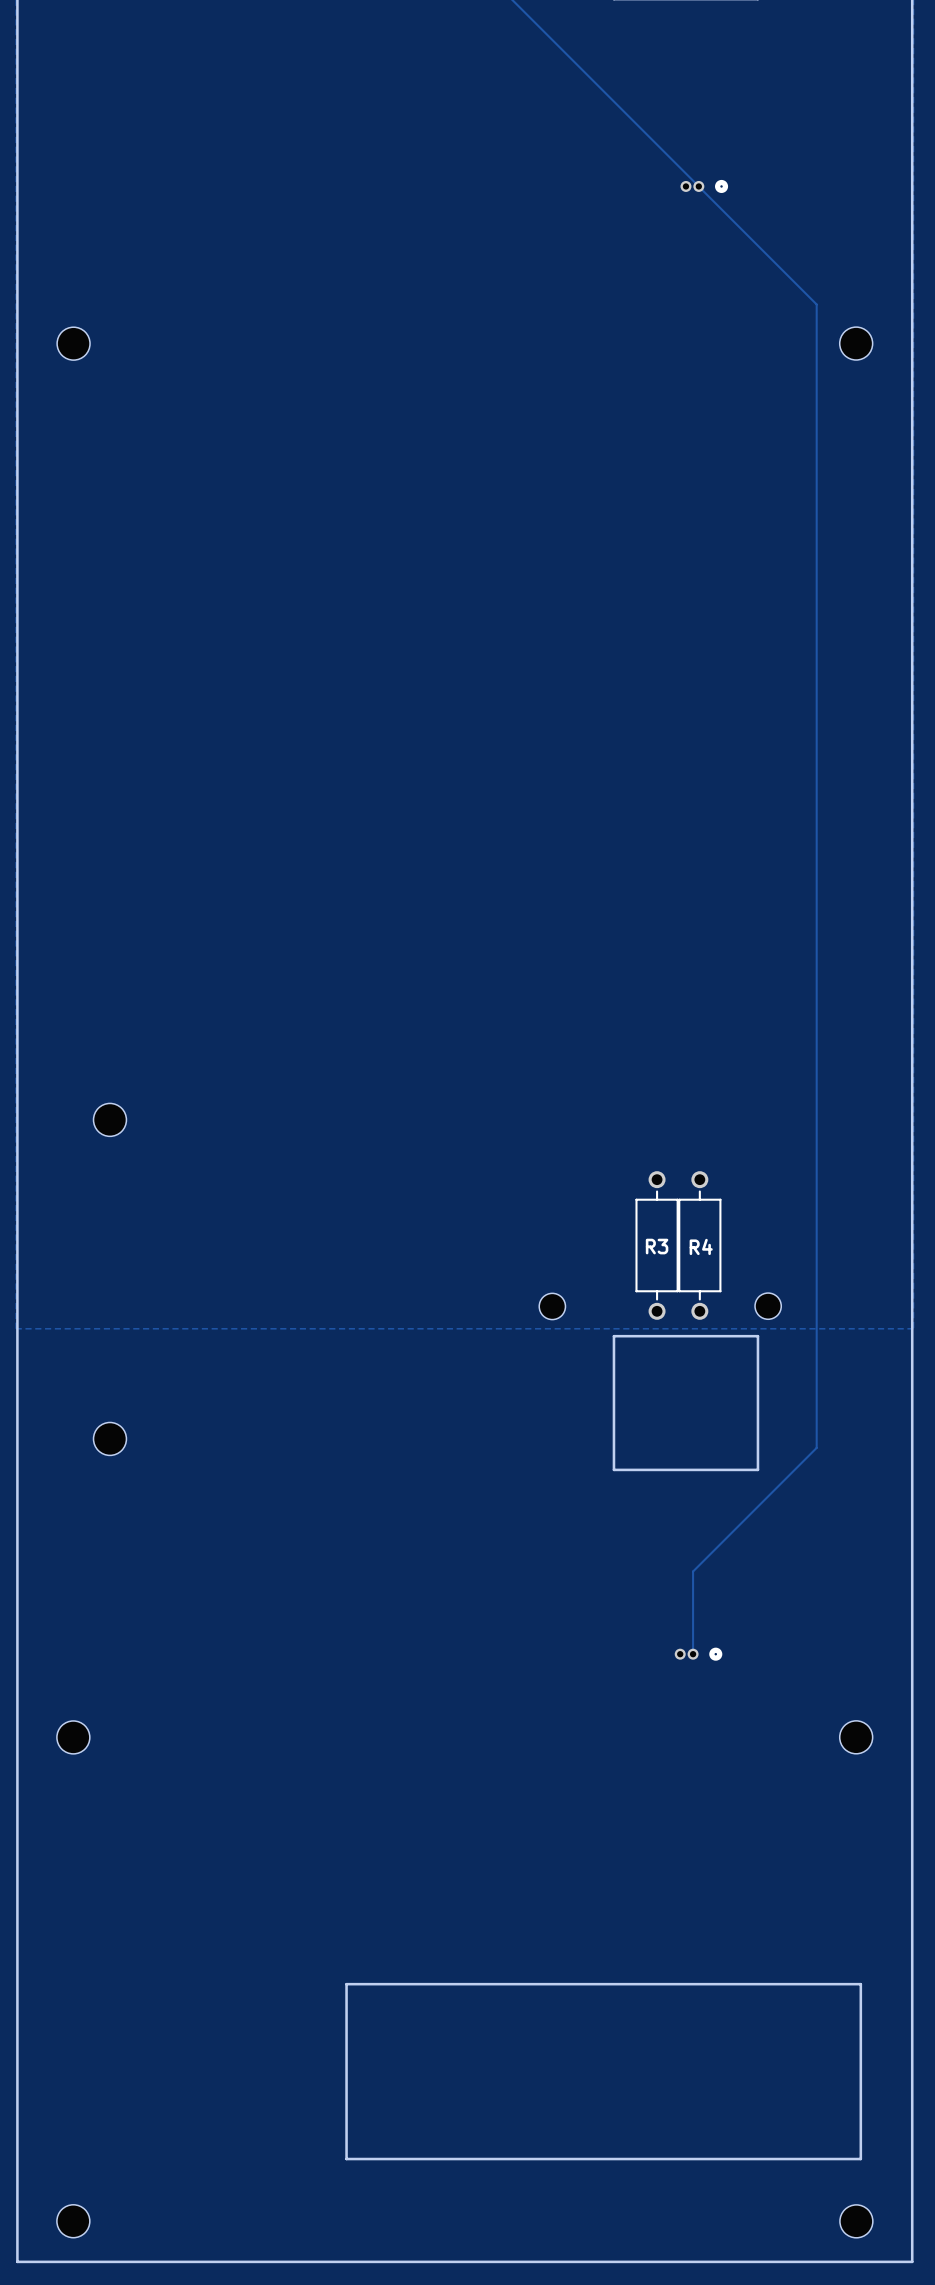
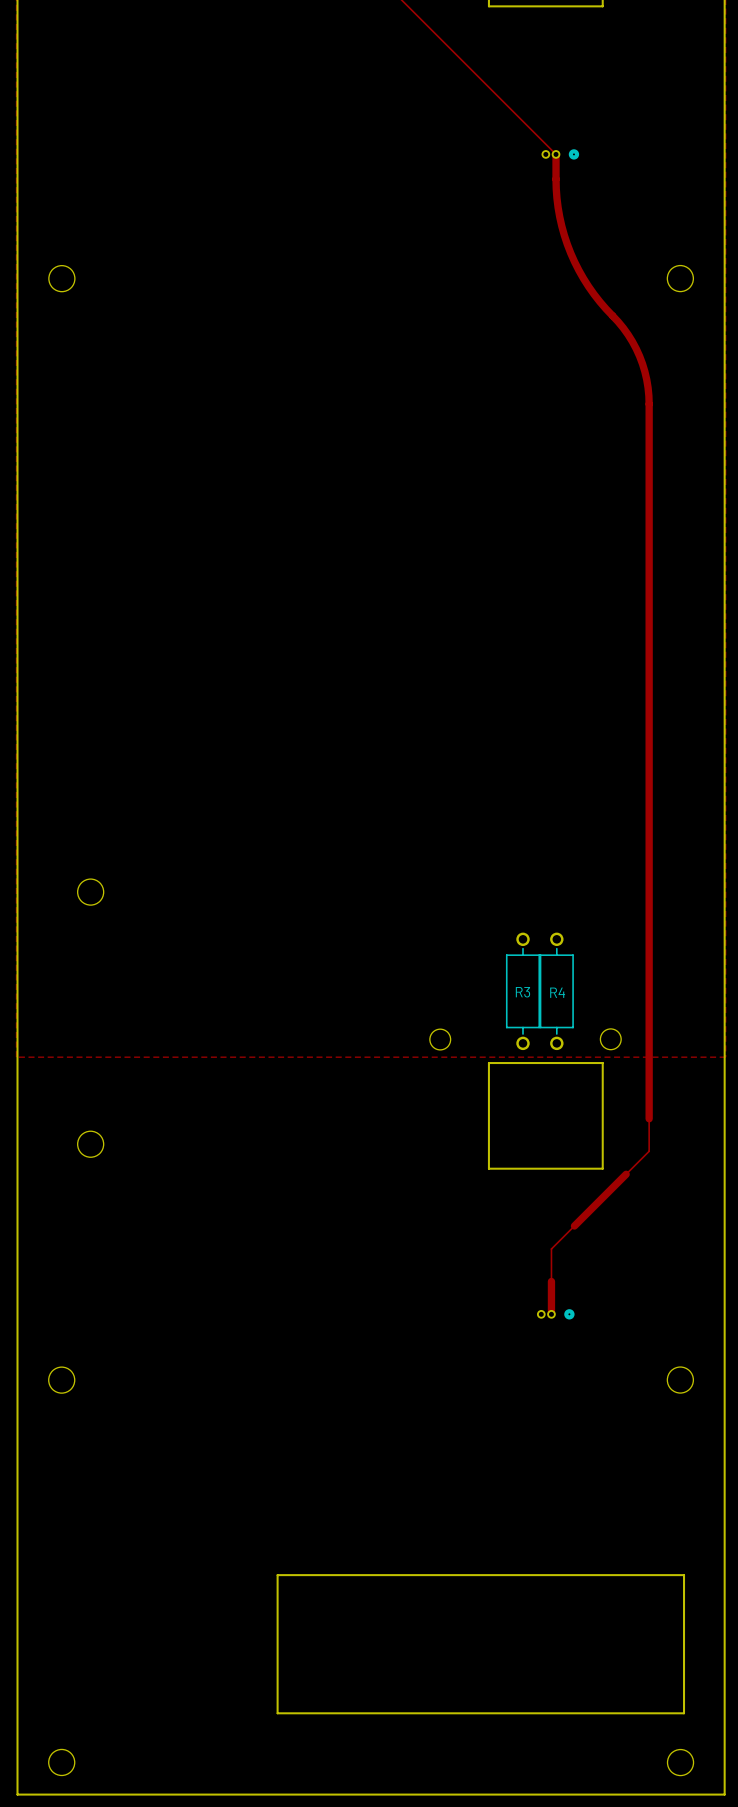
track: (698, 186) (816, 304) (816, 502) -> (556, 154) (558, 207) (567, 244) (588, 286) (623, 328) (636, 348) (646, 379) (649, 404)
track width: thin (816, 502) (816, 1406) -> thick (649, 404) (649, 1118)
track width: thin (787, 1476) (722, 1542) -> thick (626, 1174) (574, 1226)
track width: thin (693, 1612) (693, 1654) -> thick (551, 1281) (551, 1314)

